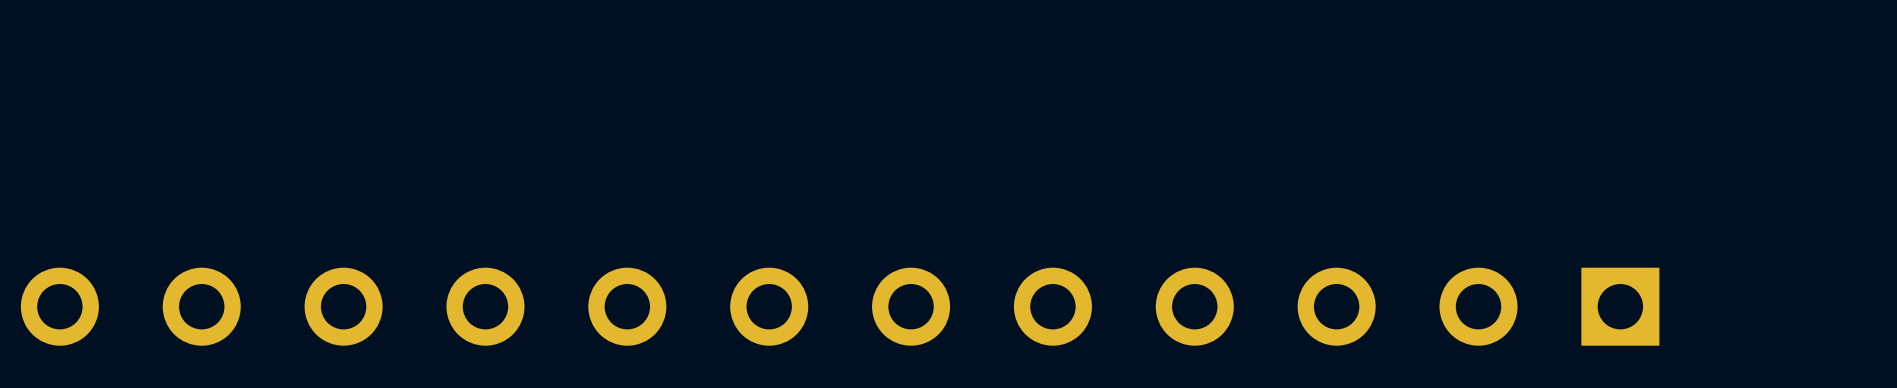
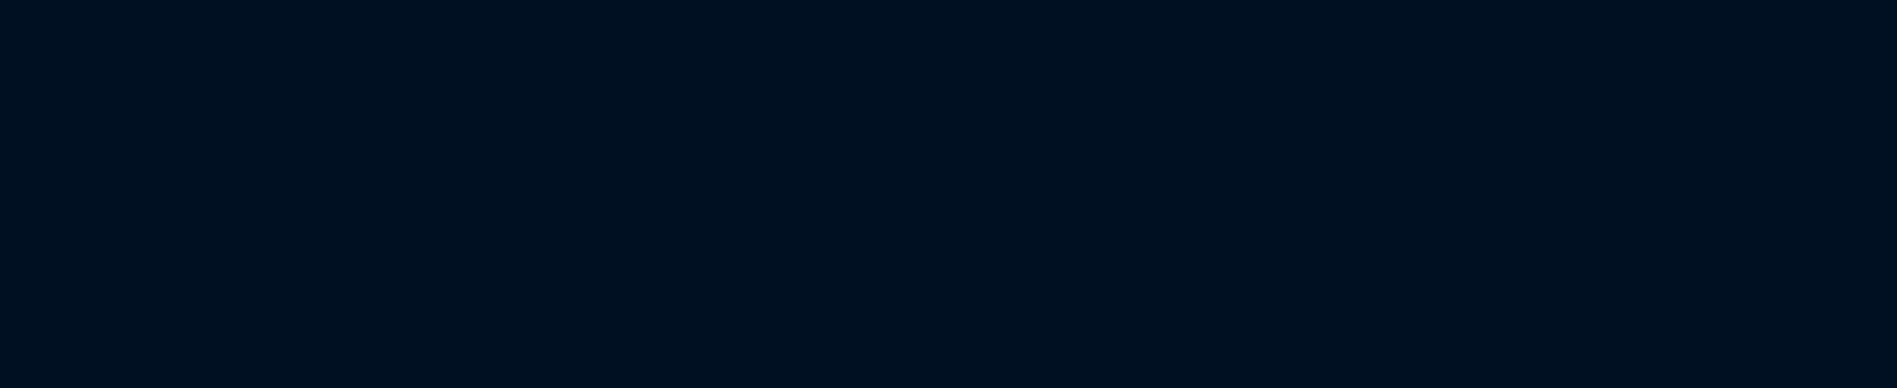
part: (840, 306) -> none

